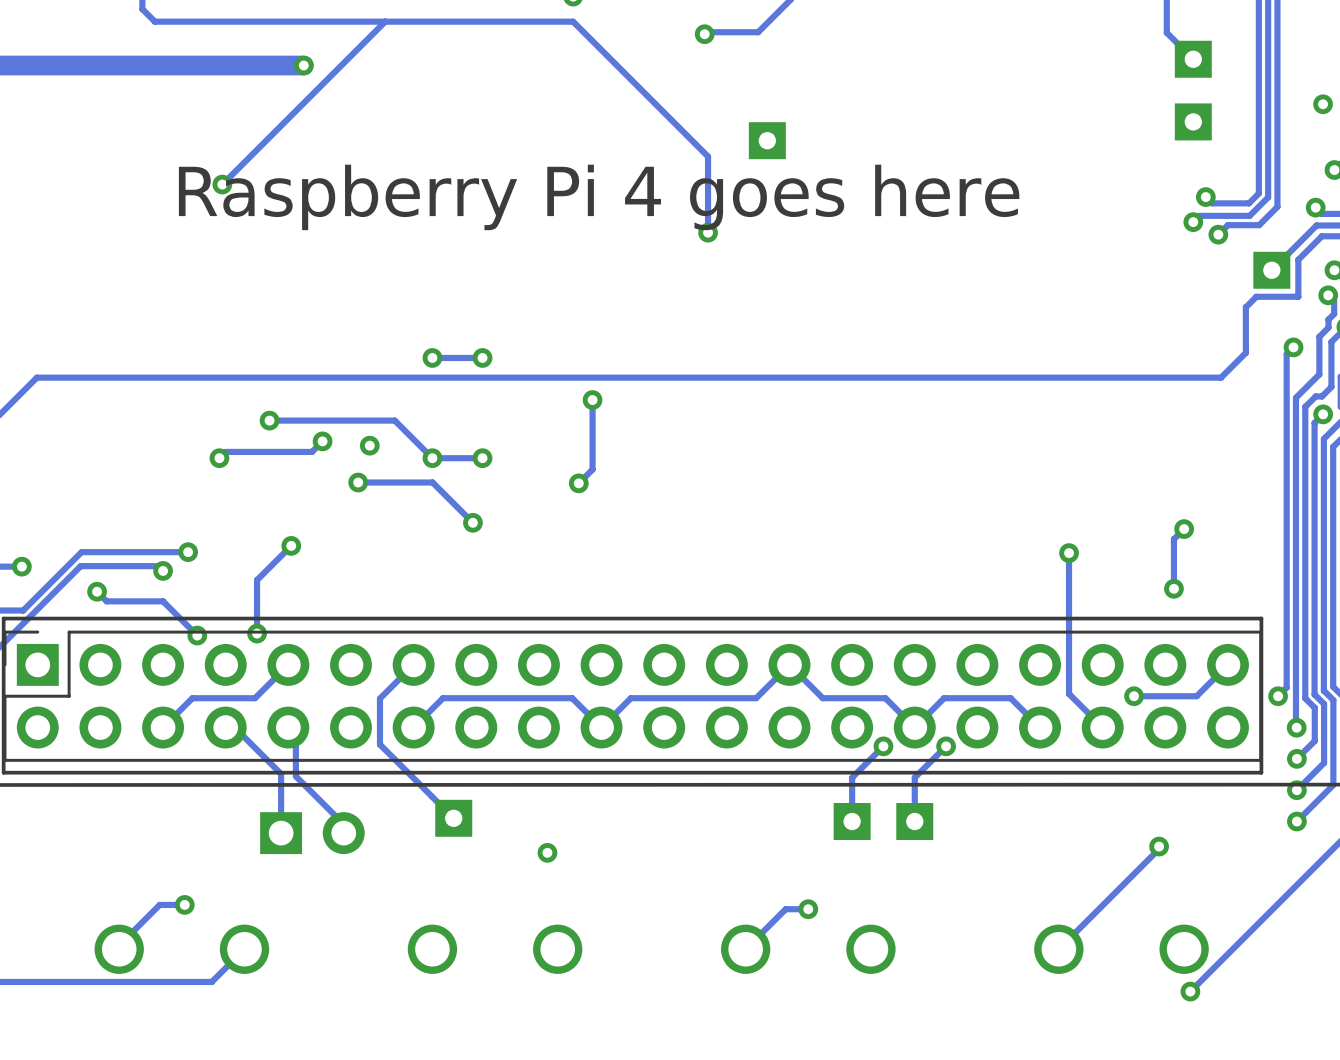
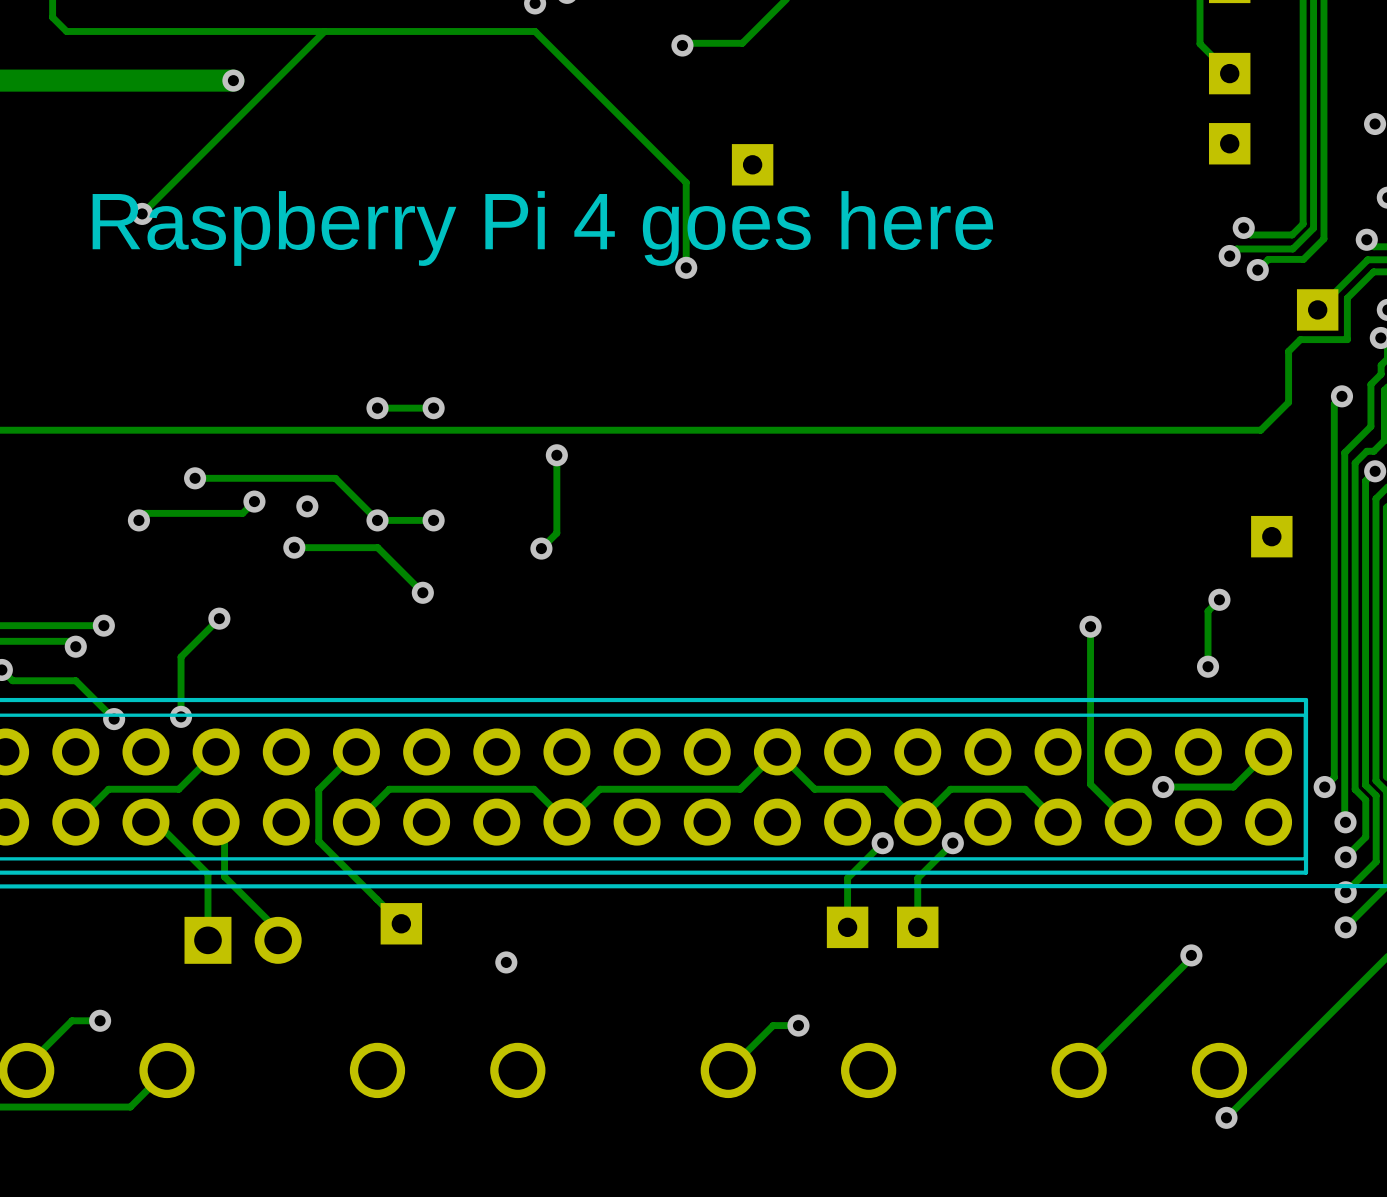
part: none -> (1271, 536)

